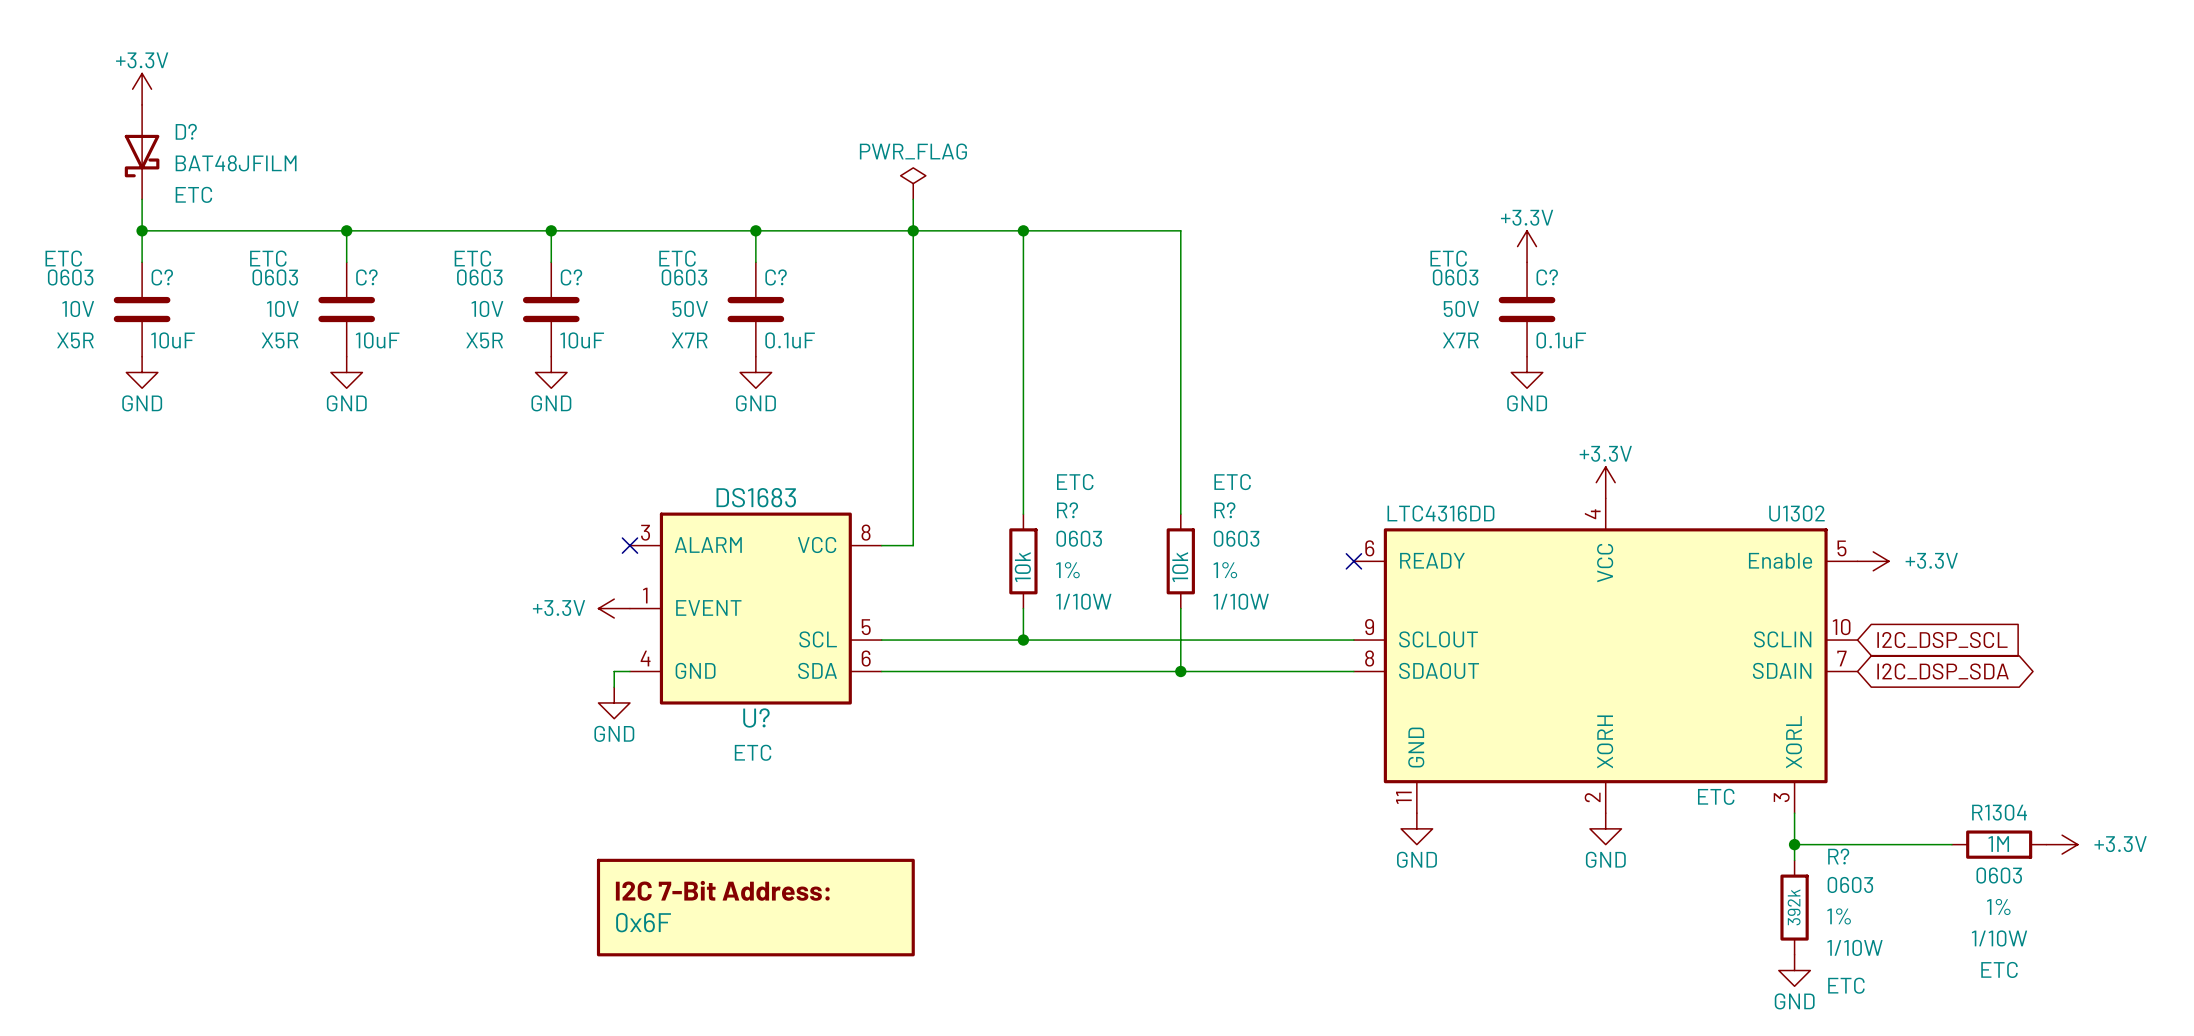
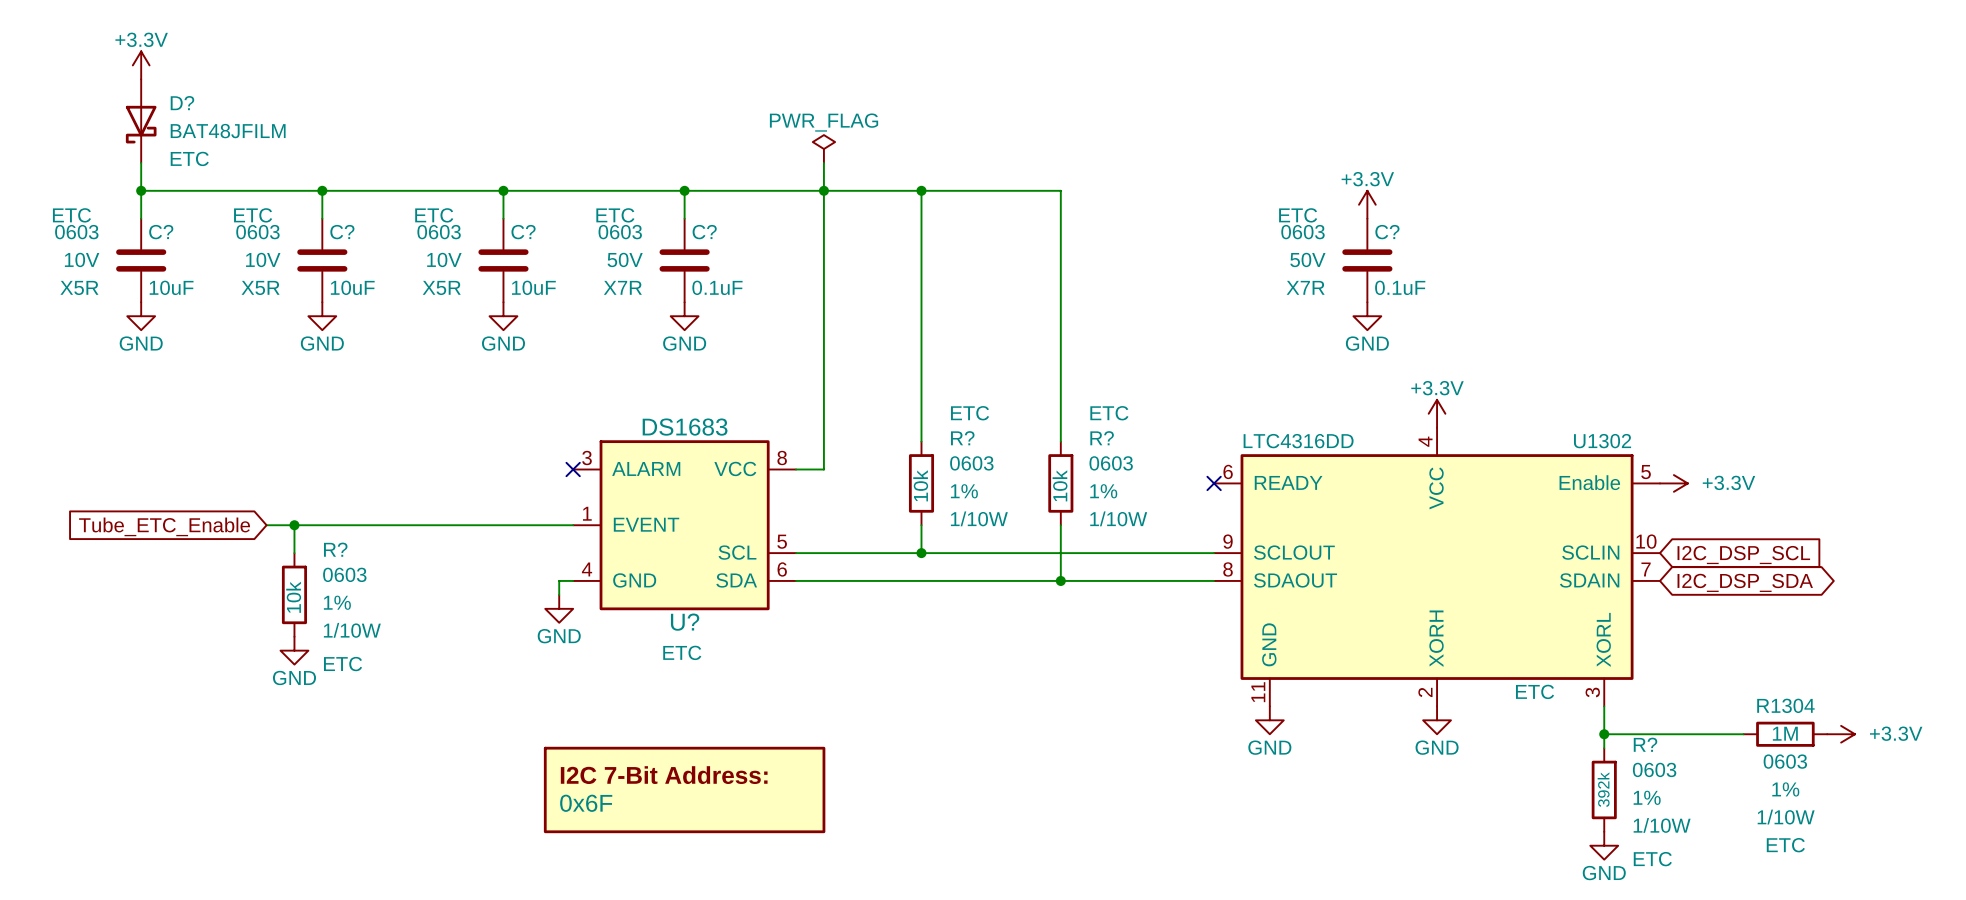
global label: none -> Tube_ETC_Enable (164, 526)
wire: none -> (266, 525) (573, 525)
wire: none -> (294, 525) (294, 553)
junction: none -> (294, 525)
power symbol: +3.3V (614, 608) -> none
R?: none -> 10k (294, 594)
power symbol: none -> GND (294, 650)

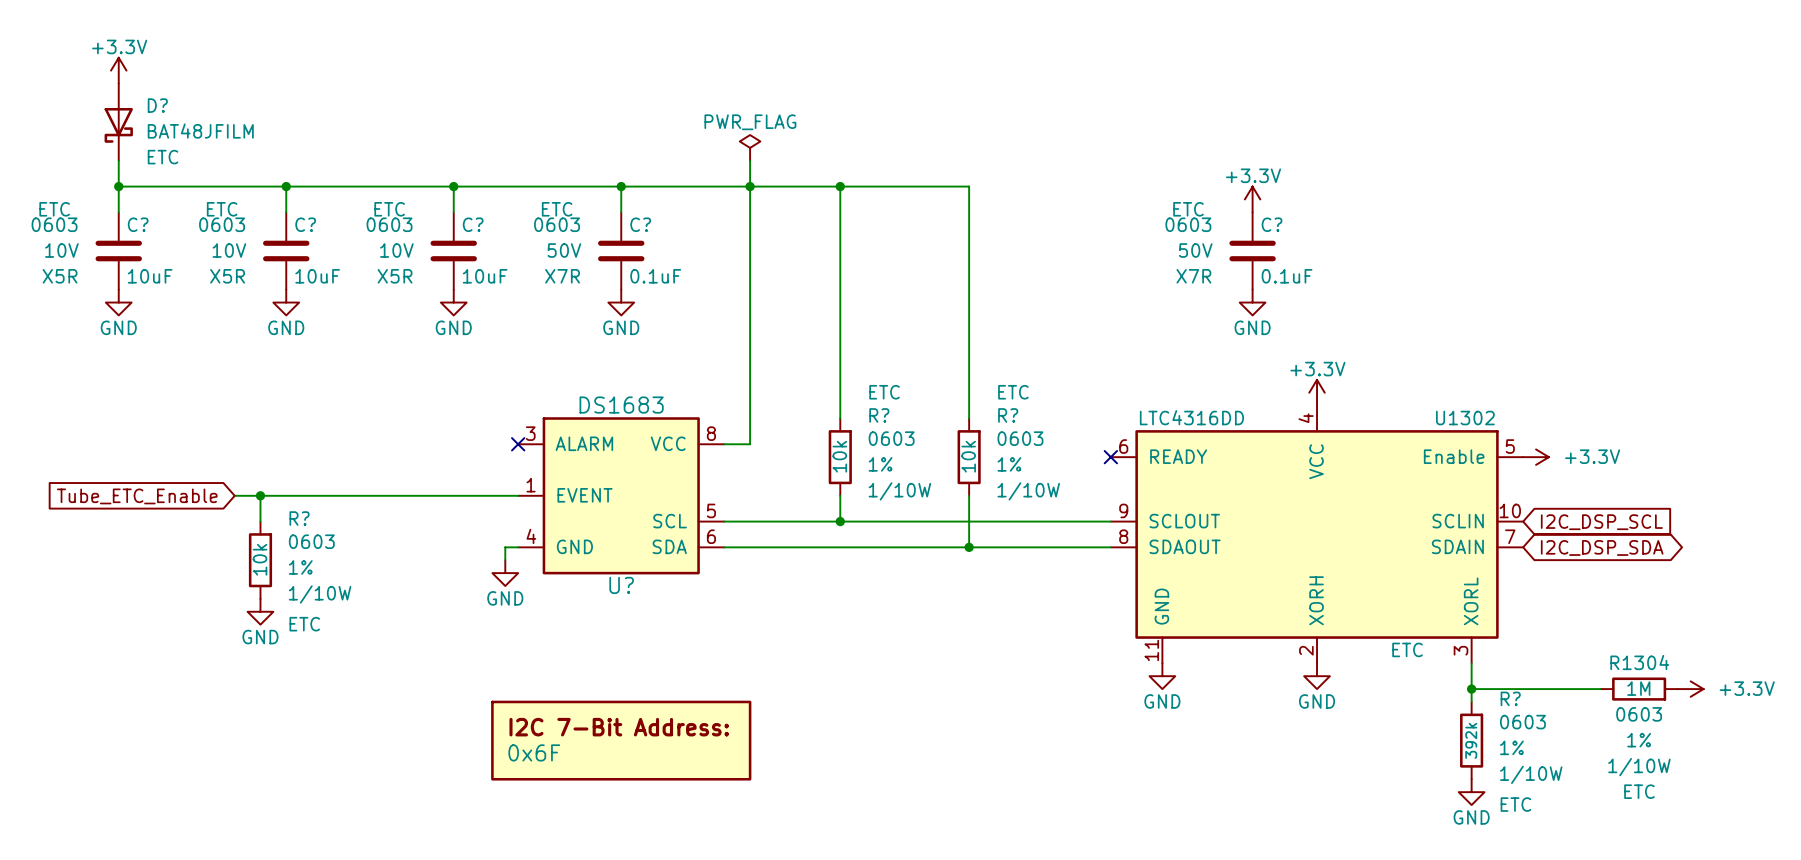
U? text: ETC (682, 652) -> none

